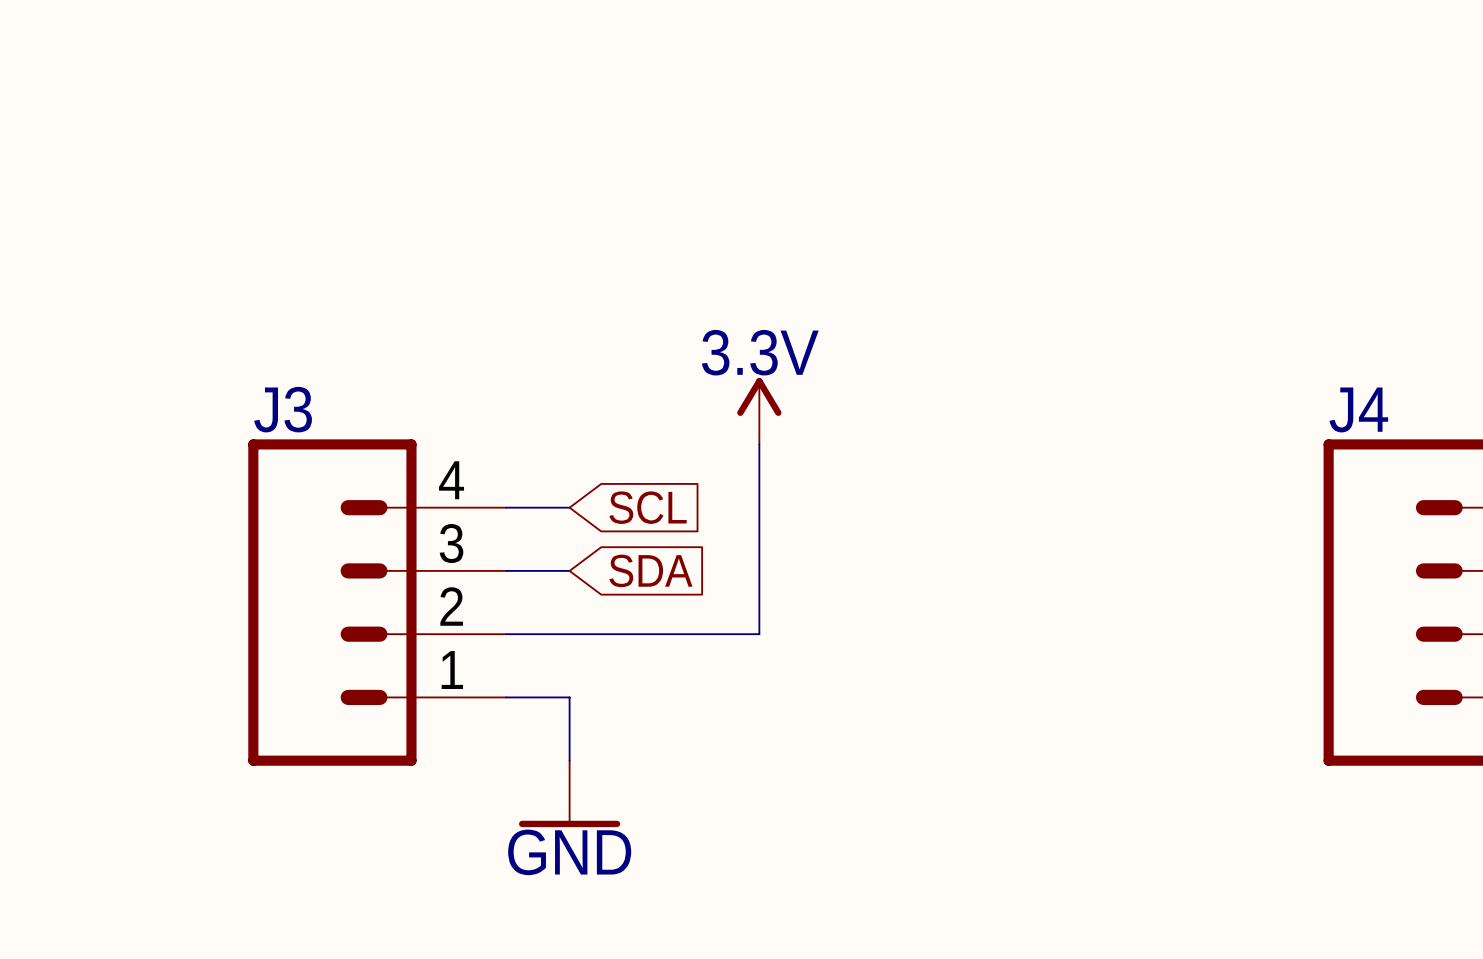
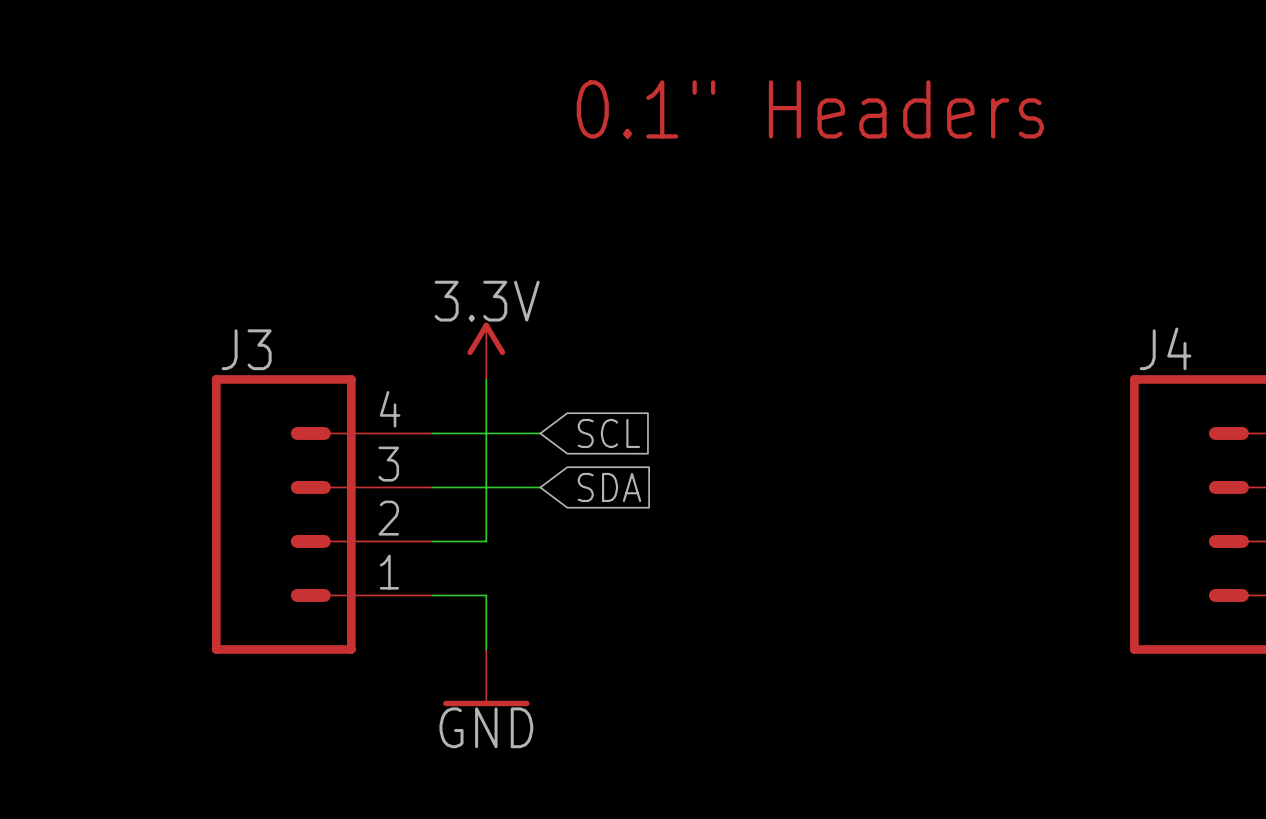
text: none -> 0.1" Headers (810, 109)
power symbol position: 3.3V (759, 411) -> 3.3V (486, 351)
wire: (759, 444) (759, 634) (569, 634) -> (486, 379) (486, 541)
wire: none -> (486, 433) (540, 433)
global label position: SCL (648, 507) -> SCL (608, 433)
wire: none -> (486, 487) (540, 487)
global label position: SDA (650, 570) -> SDA (609, 487)

